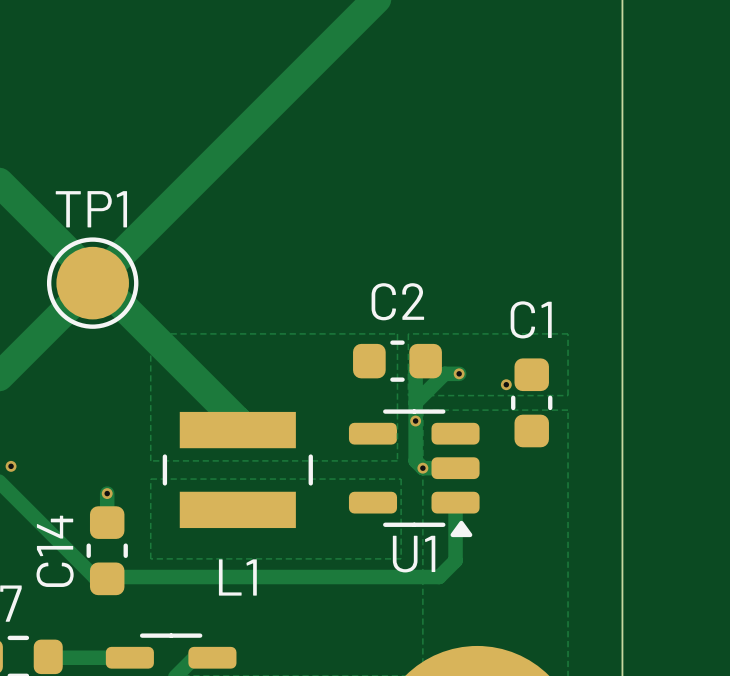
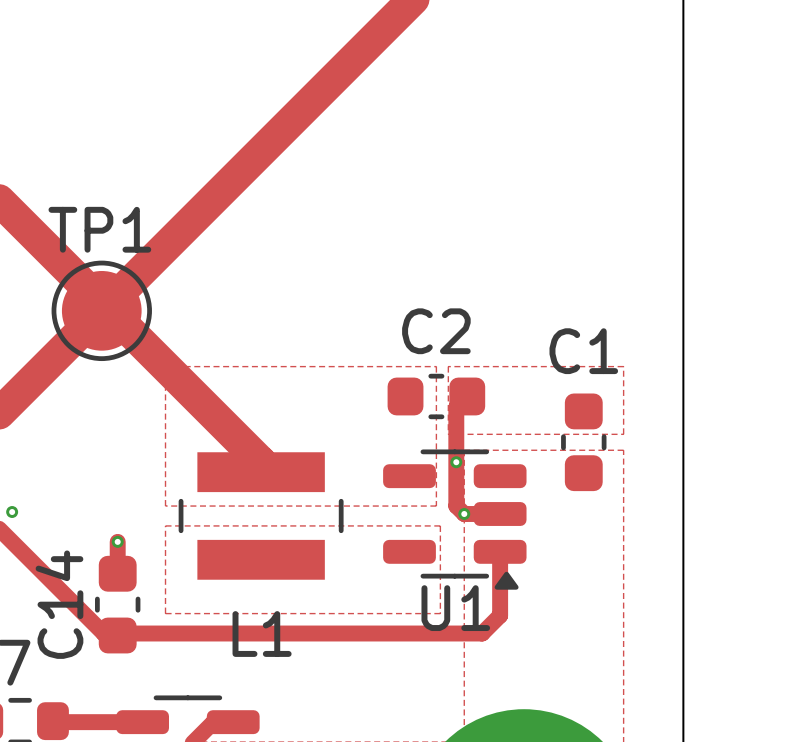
track: (459, 373) (444, 373) (415, 402) -> none
via: (459, 373) -> none
via: (506, 384) -> none

